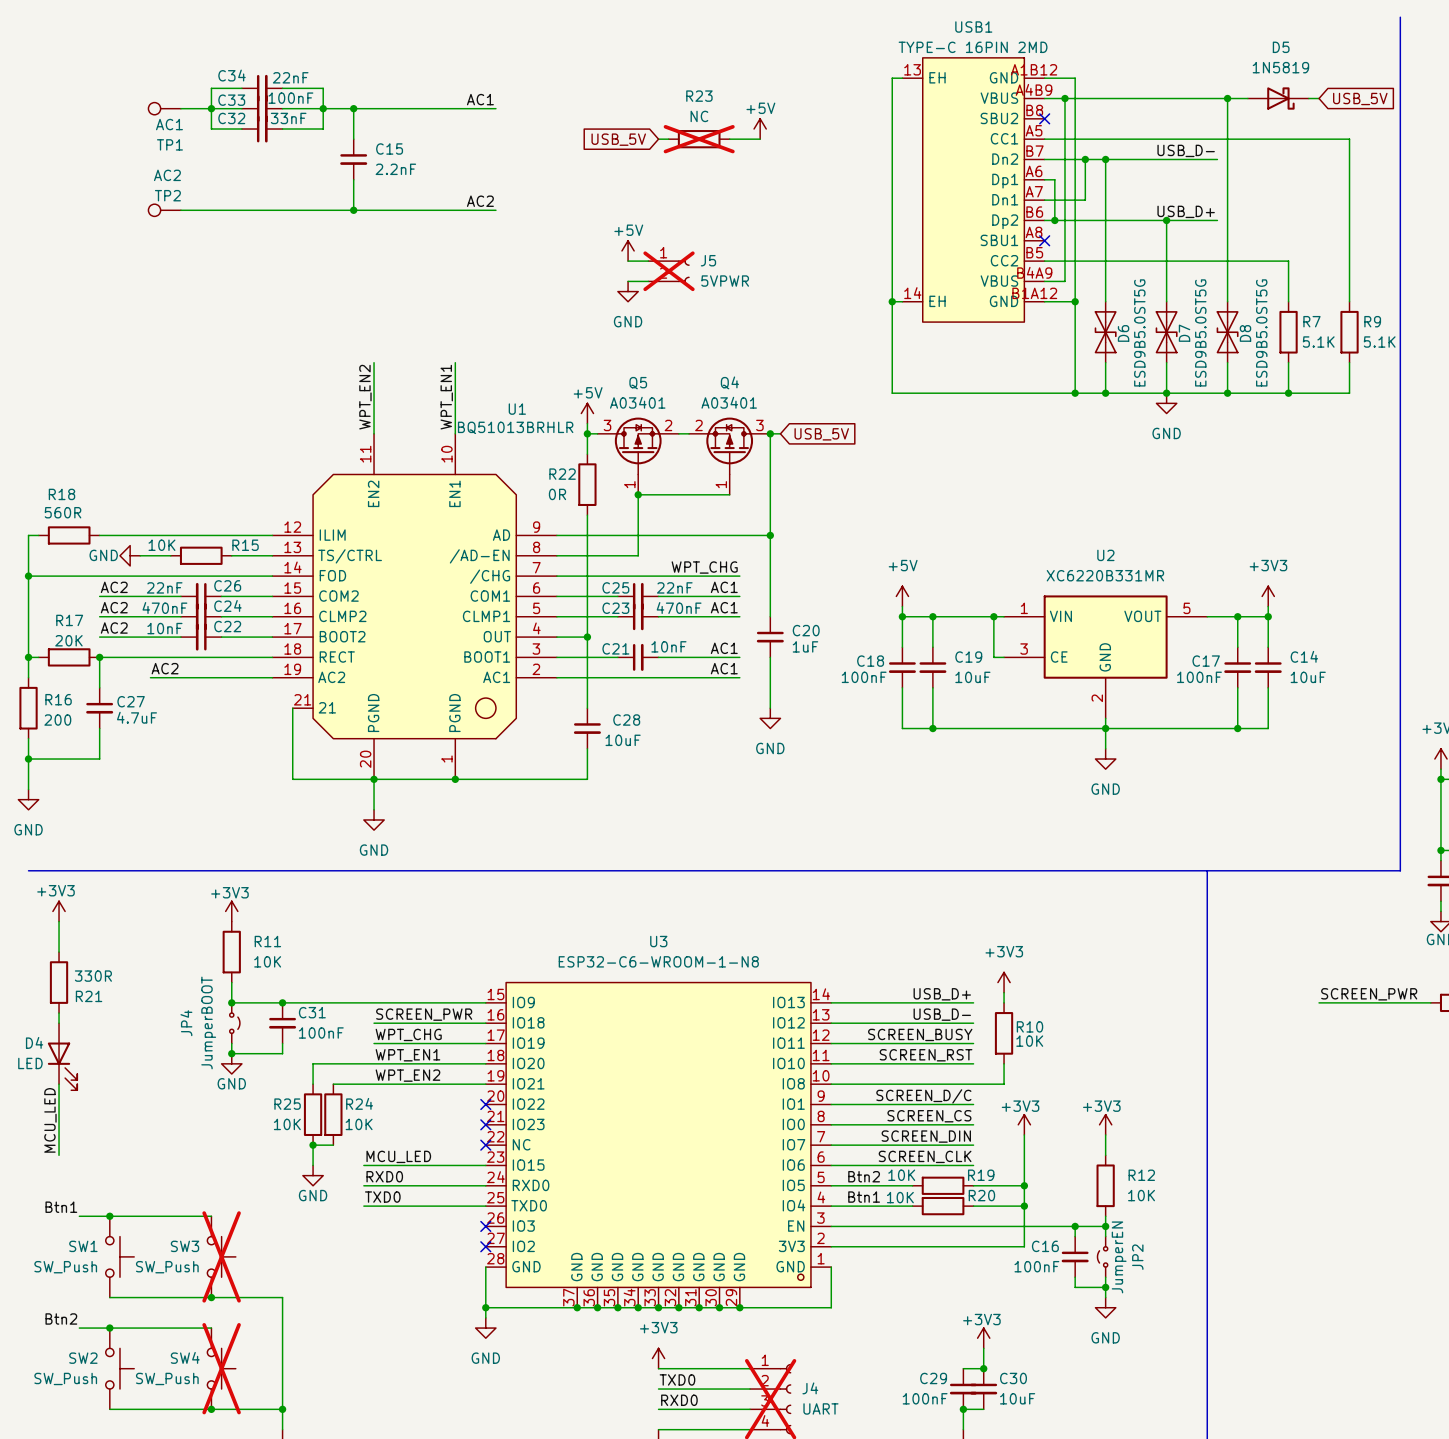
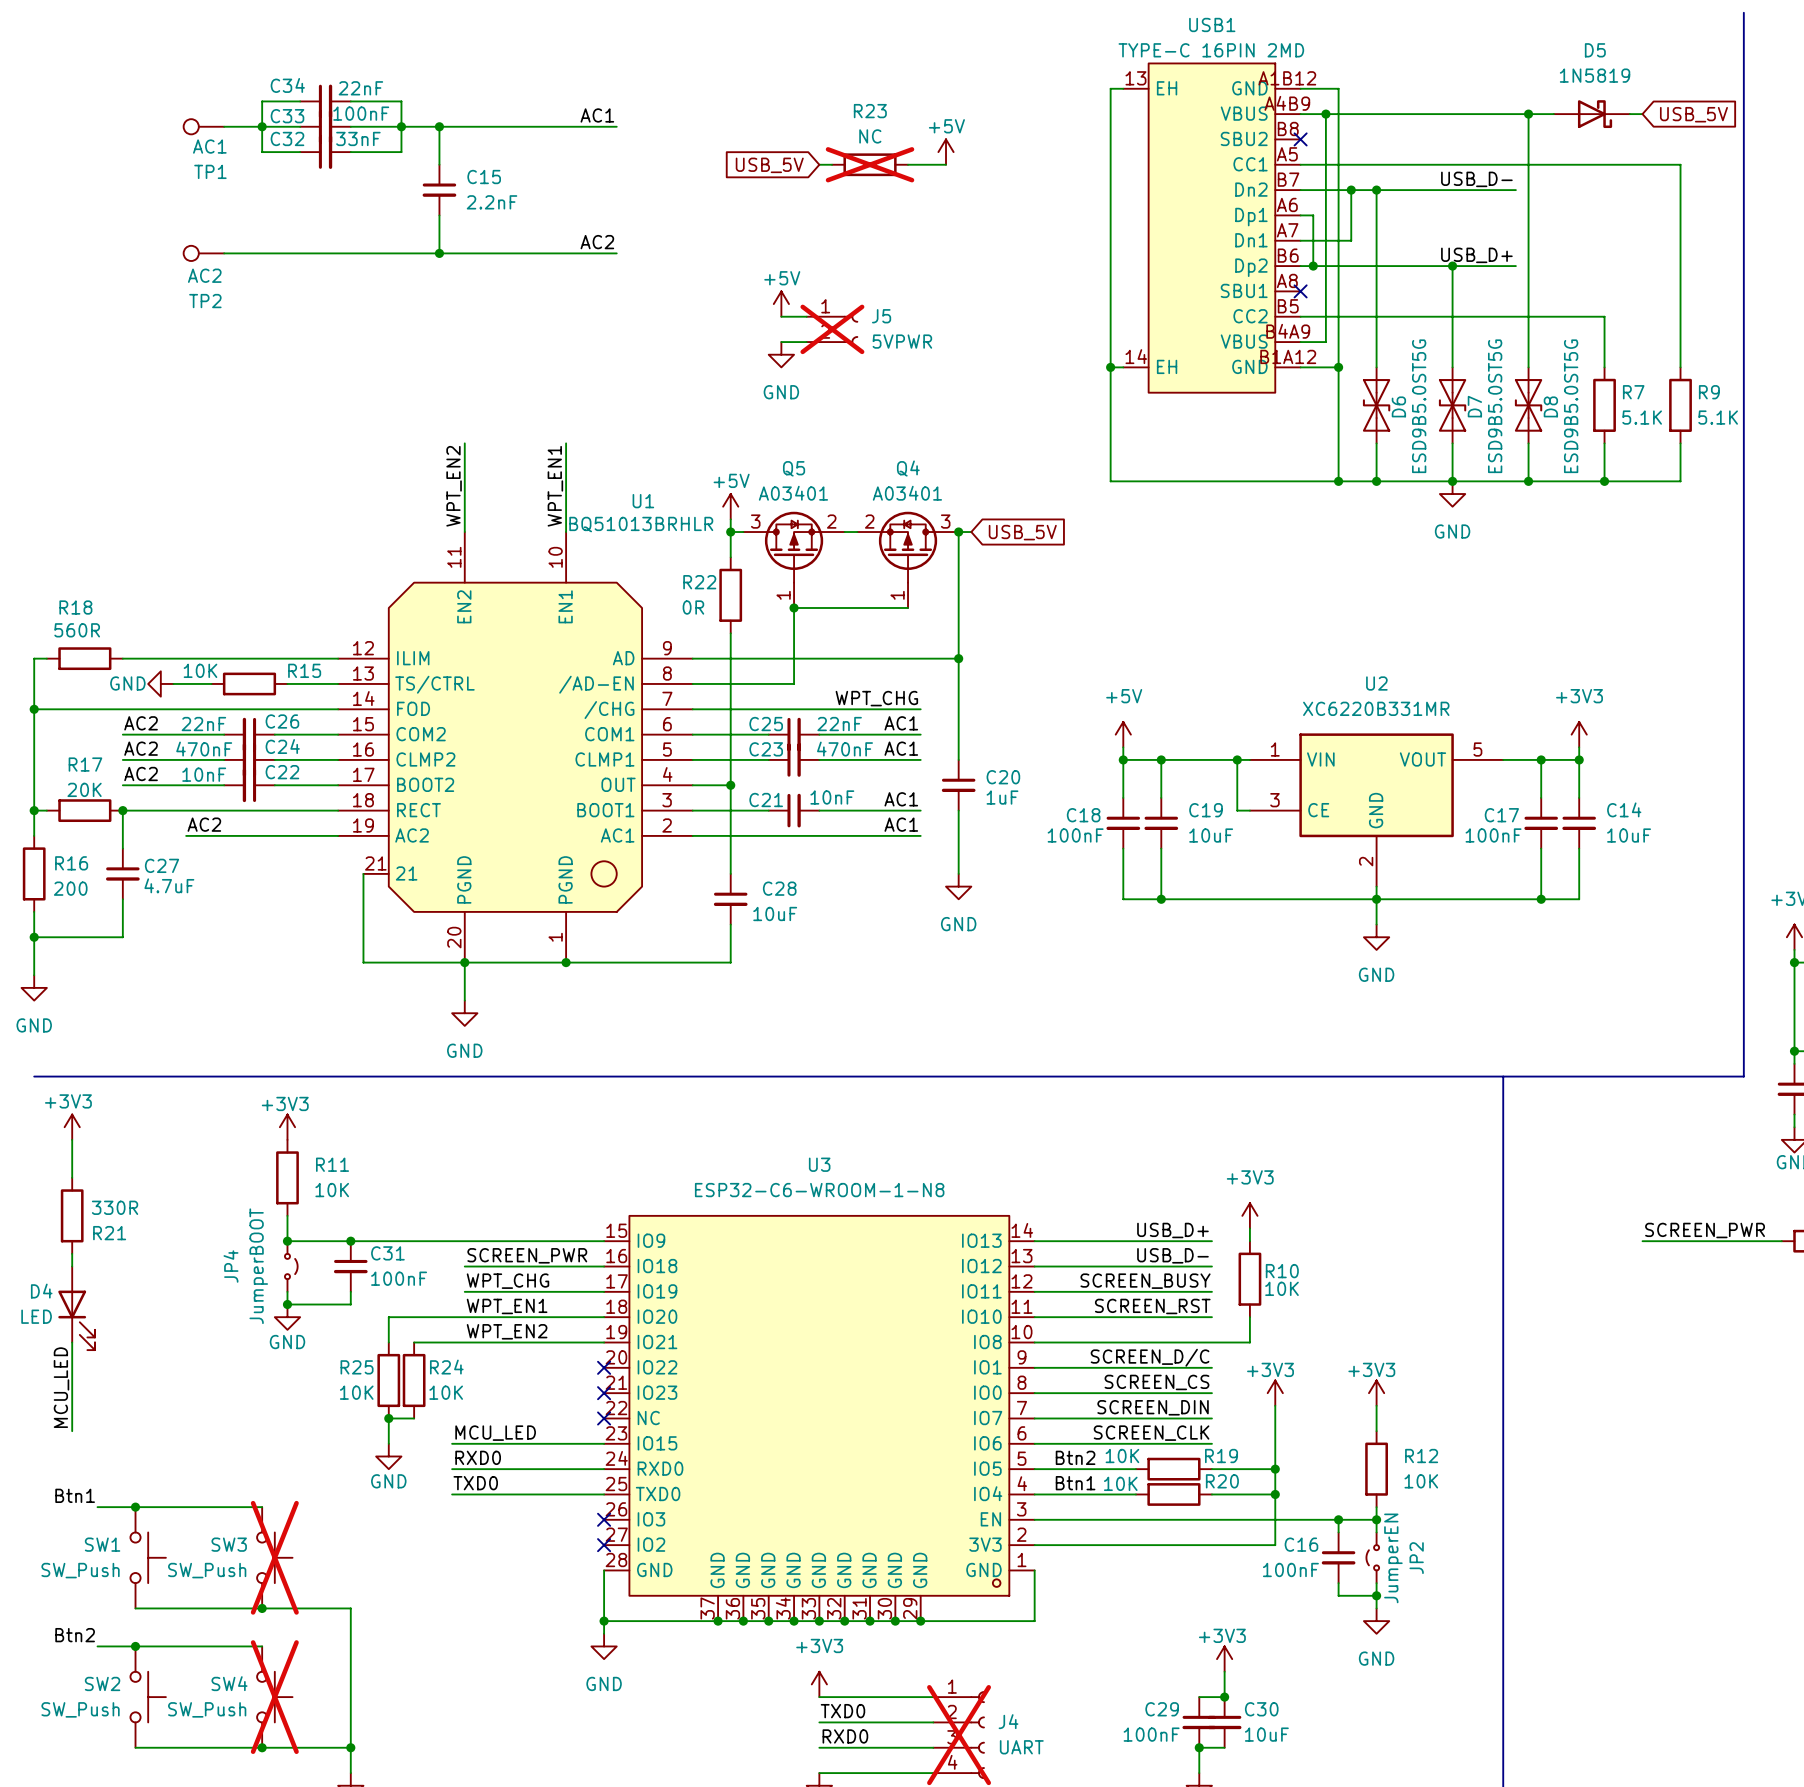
TP2 value position: AC2 (167, 175) -> AC2 (204, 275)
TP2 name position: TP2 (167, 195) -> TP2 (205, 301)

